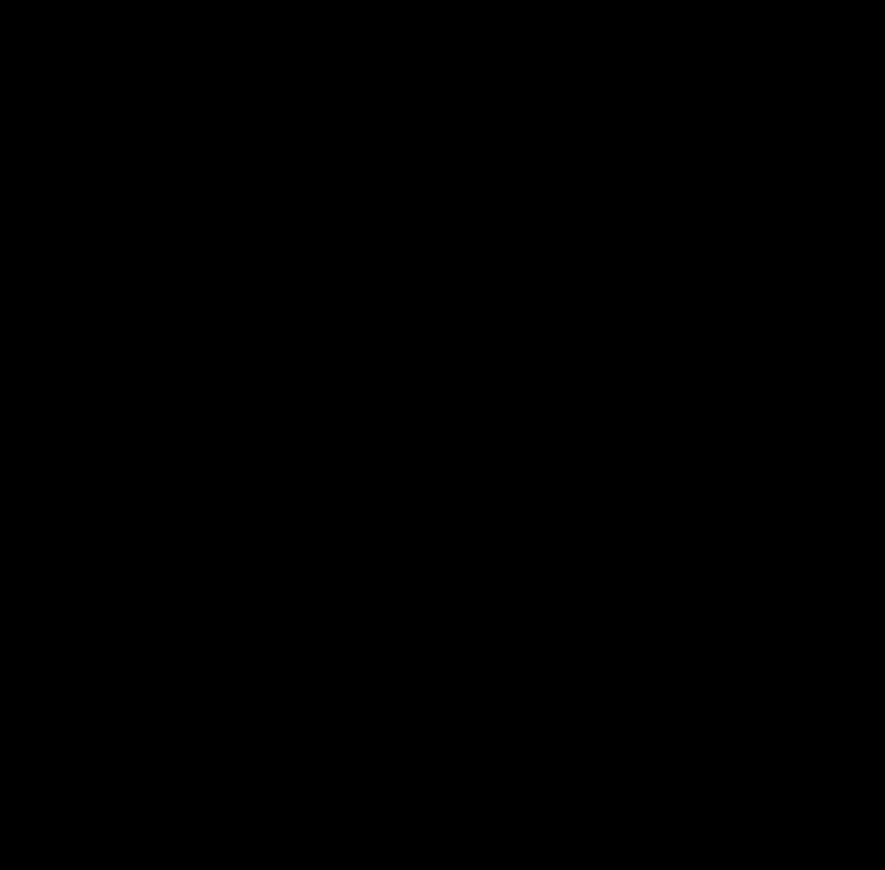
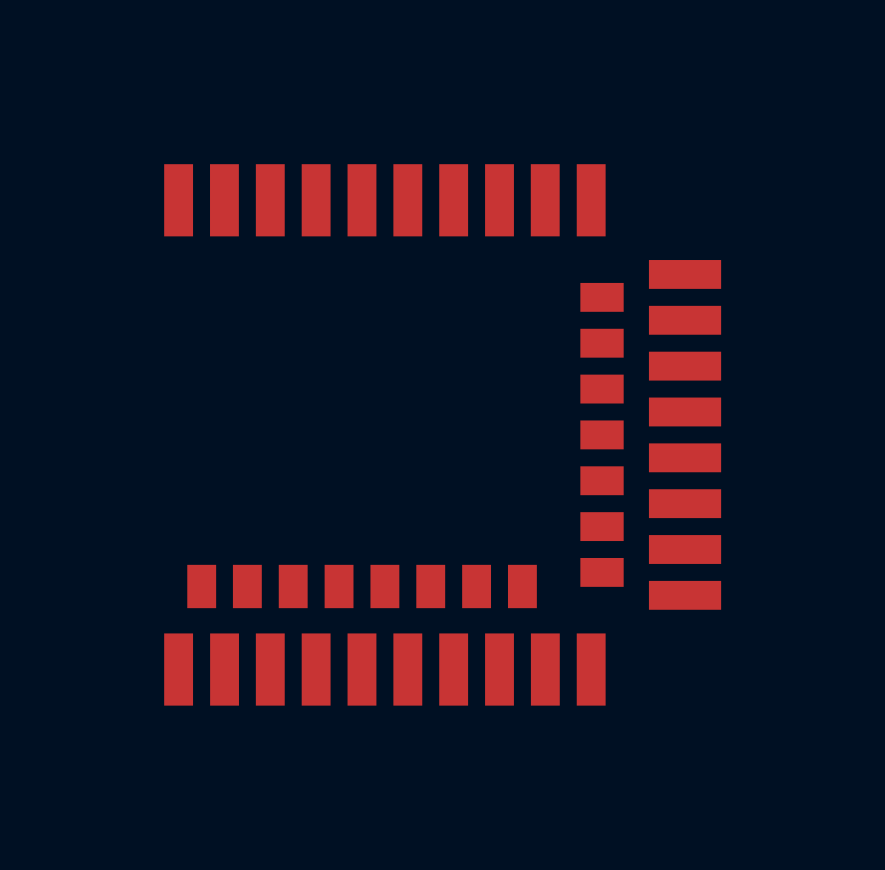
part: none -> (442, 434)

